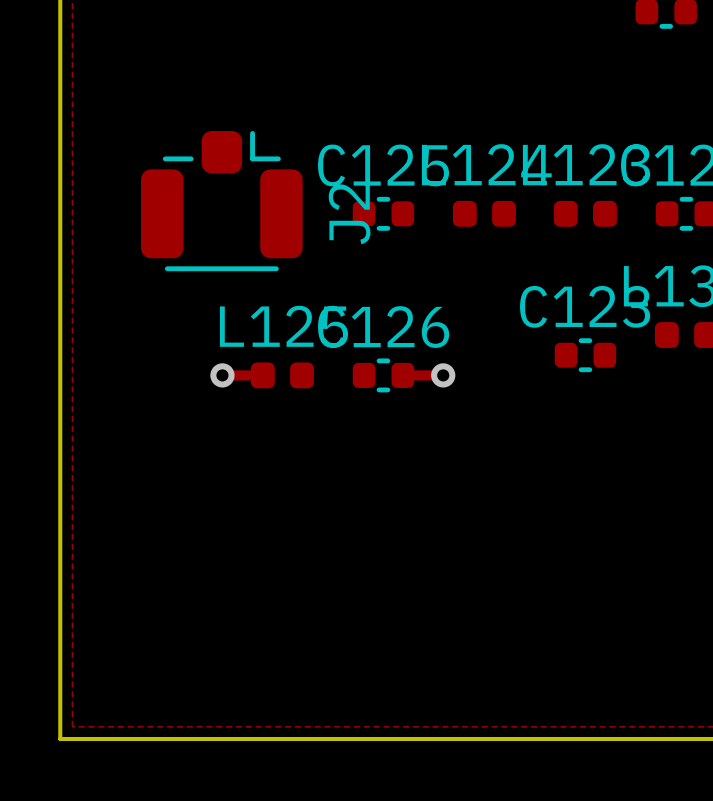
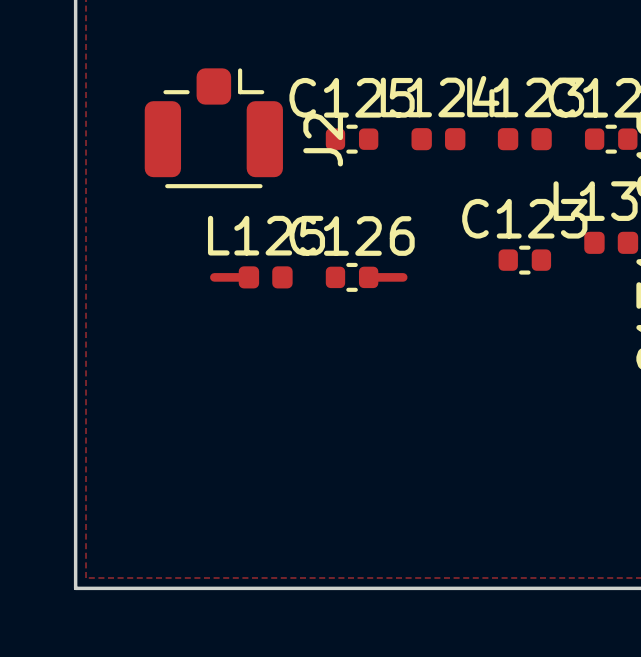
via: (222, 375) -> none
via: (443, 375) -> none

